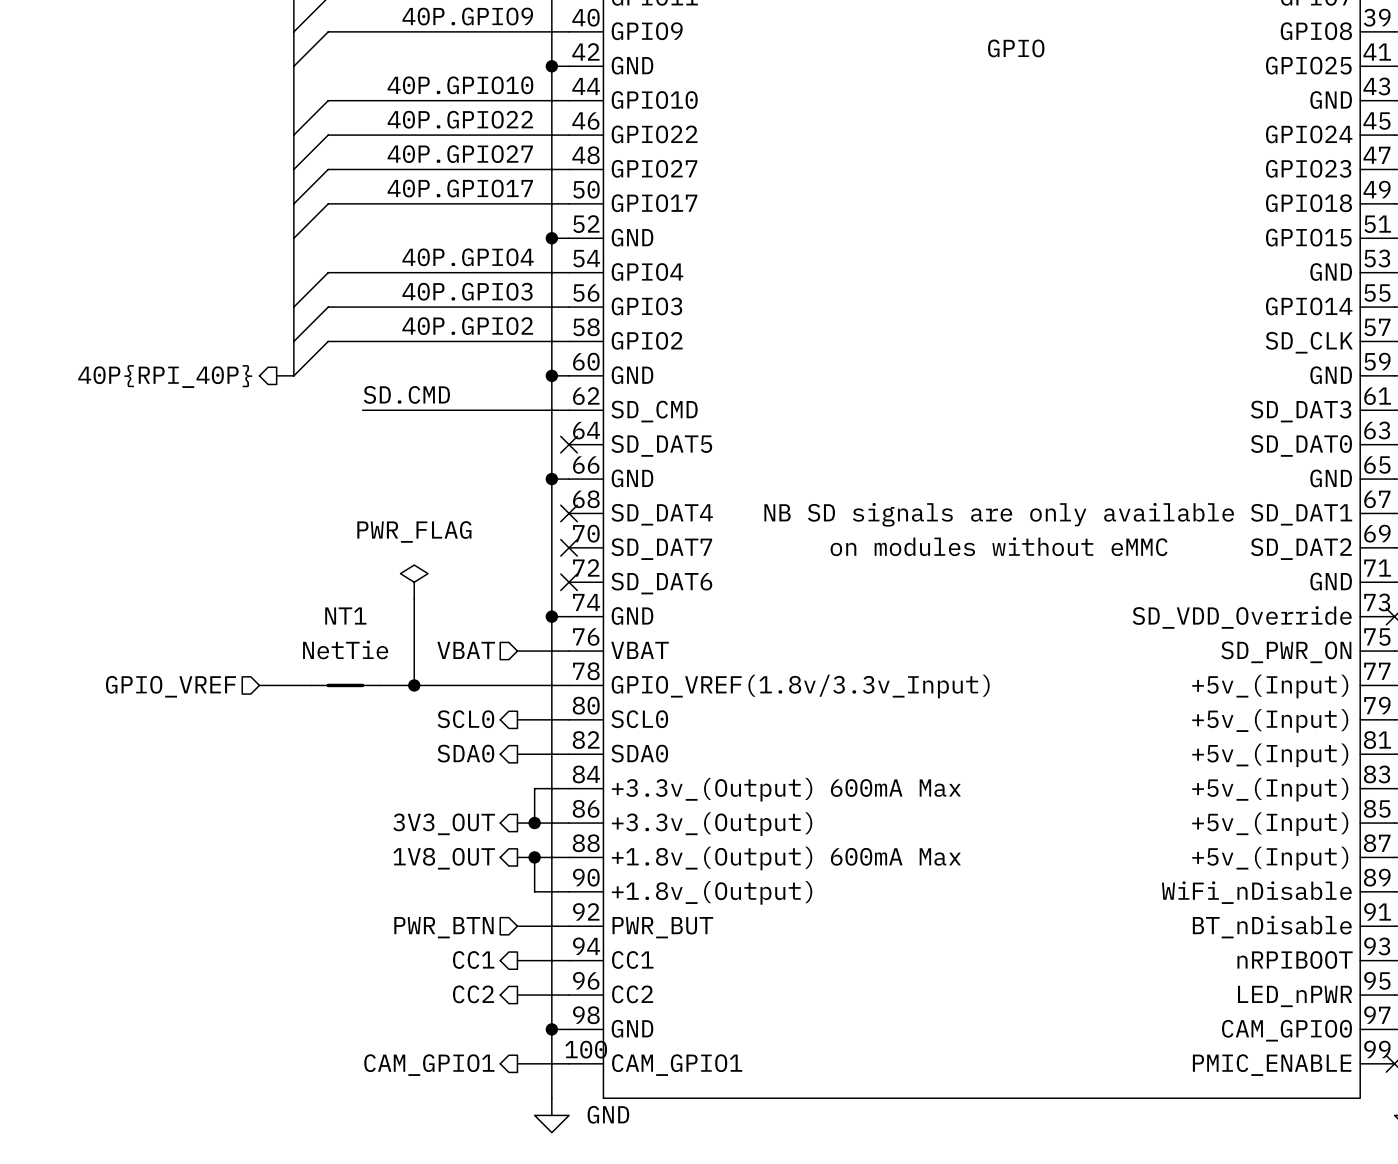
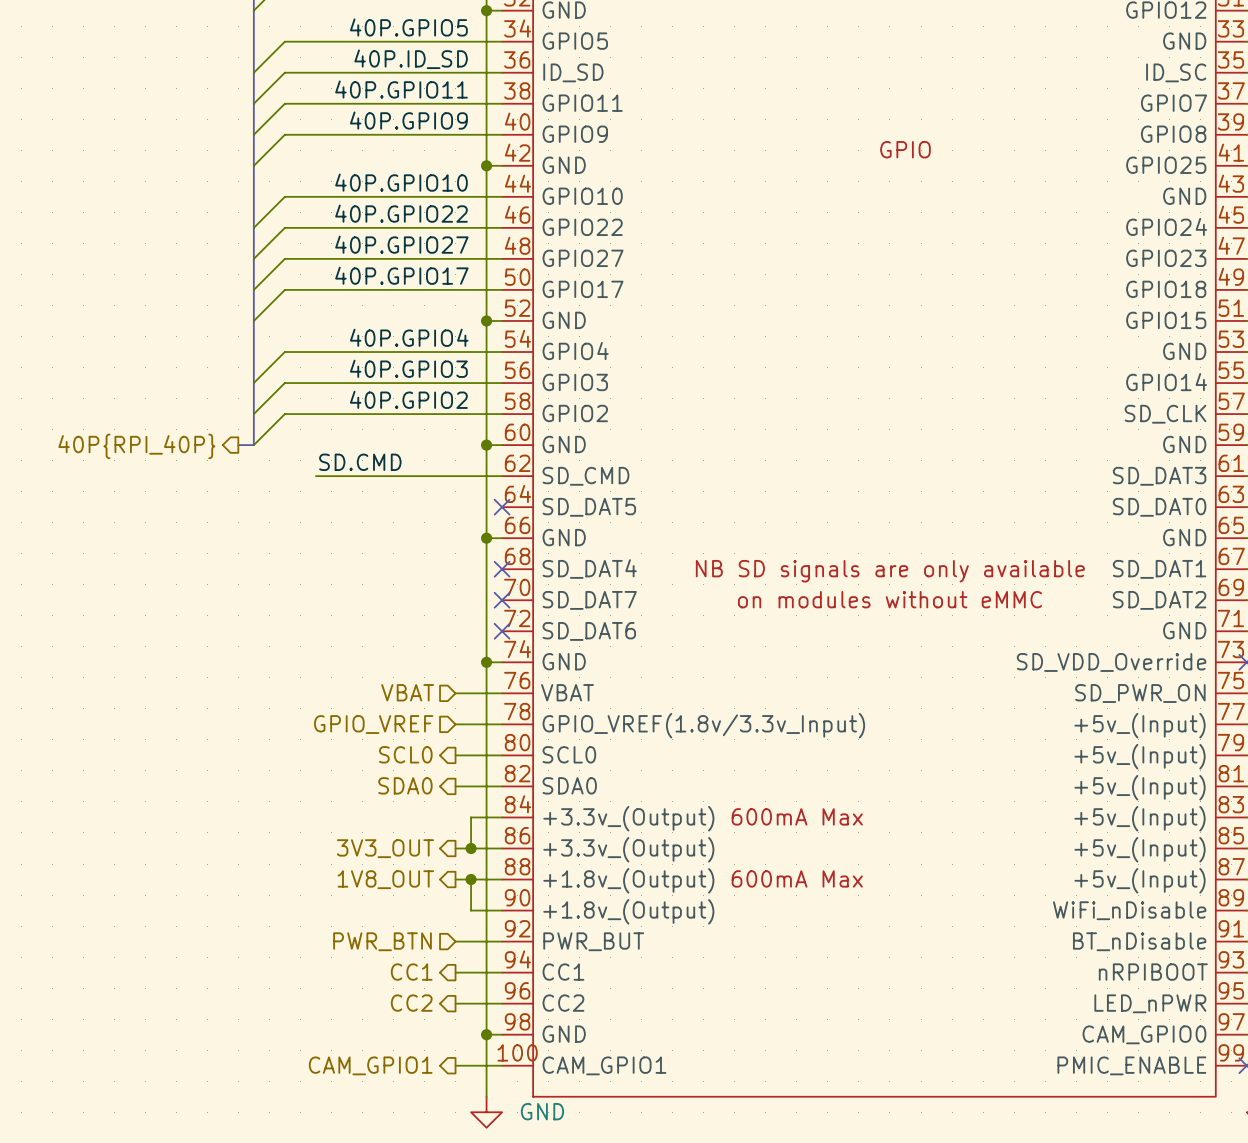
power symbol: PWR_FLAG (414, 582) -> none
wire: (414, 599) (414, 685) -> none
wire: (259, 685) (311, 685) -> none
NT1: NetTie (345, 685) -> none
wire: (379, 685) (517, 685) -> none
junction: (414, 685) -> none
hierarchical label position: GPIO_VREF (170, 686) -> GPIO_VREF (373, 724)

